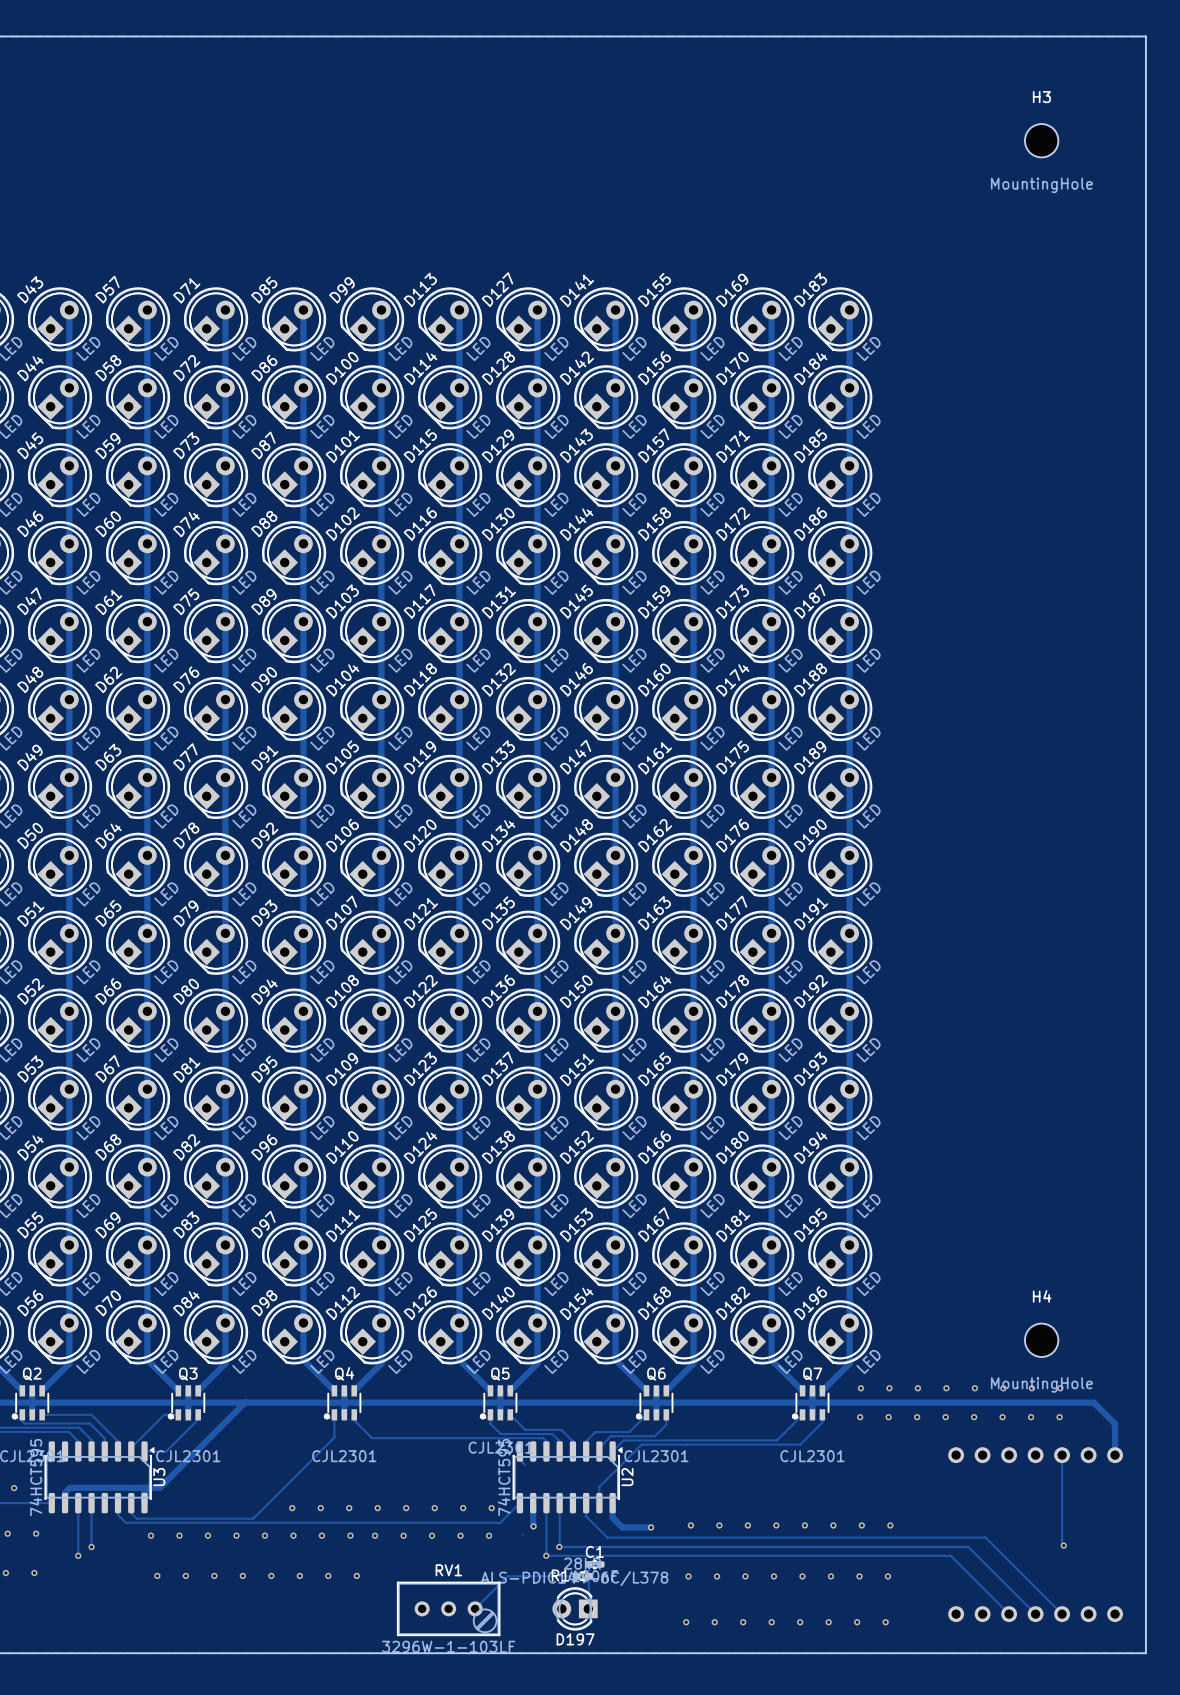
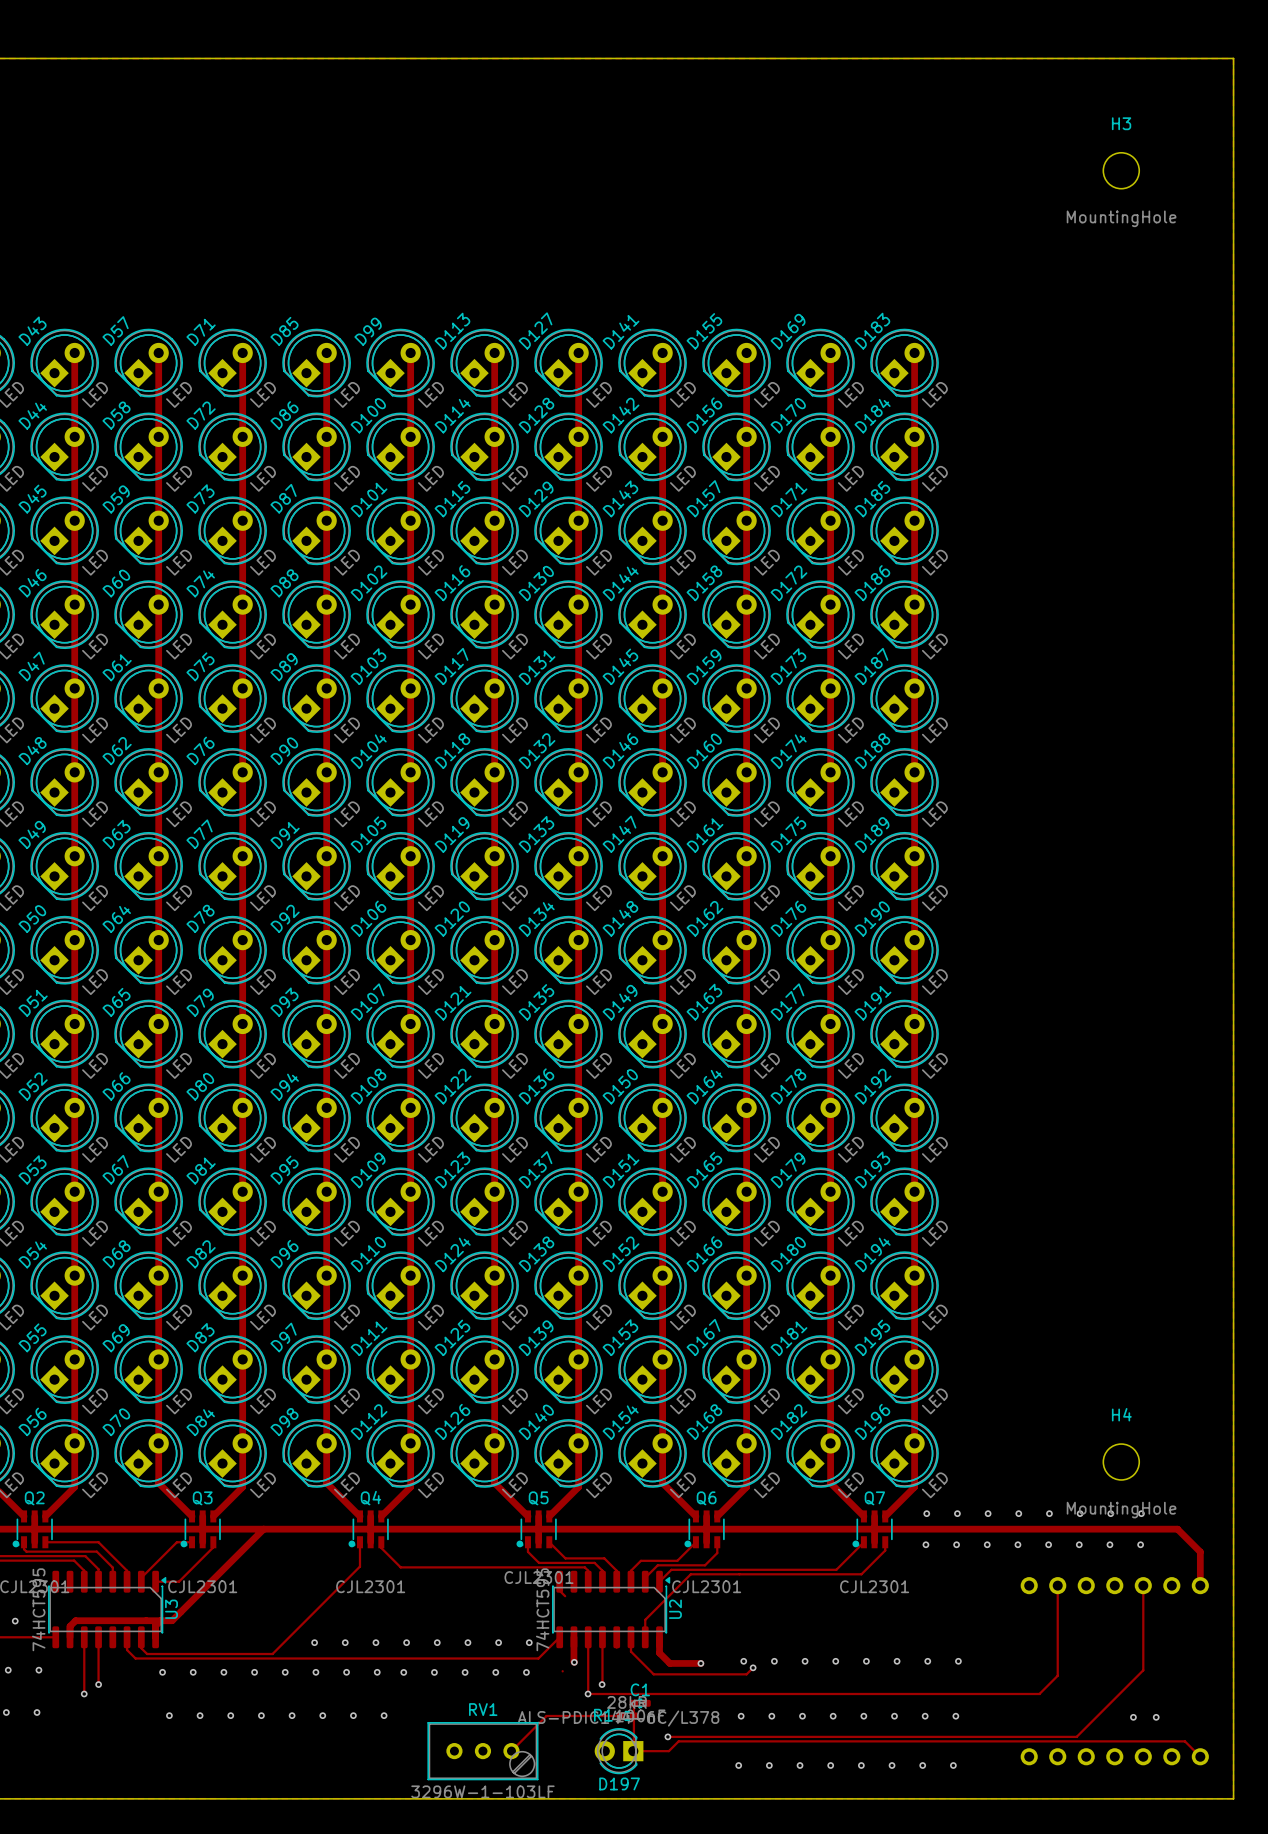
via: none -> (753, 1667)
track: (1062, 1533) (1063, 1545) -> (1143, 1670) (1076, 1736) (667, 1736)
track: (693, 1537) (985, 1537) (1062, 1614) -> (746, 1674) (753, 1667)
via: (1063, 1545) -> none
track: (559, 1547) (968, 1547) (1035, 1614) -> none
track: (950, 1555) (1009, 1614) -> (1023, 1693) (1039, 1693) (1057, 1675) (1057, 1585)
via: none -> (1133, 1717)
via: none -> (1156, 1717)
via: none -> (667, 1736)
track: none -> (633, 1751) (668, 1751) (678, 1741) (1184, 1741) (1200, 1756)

